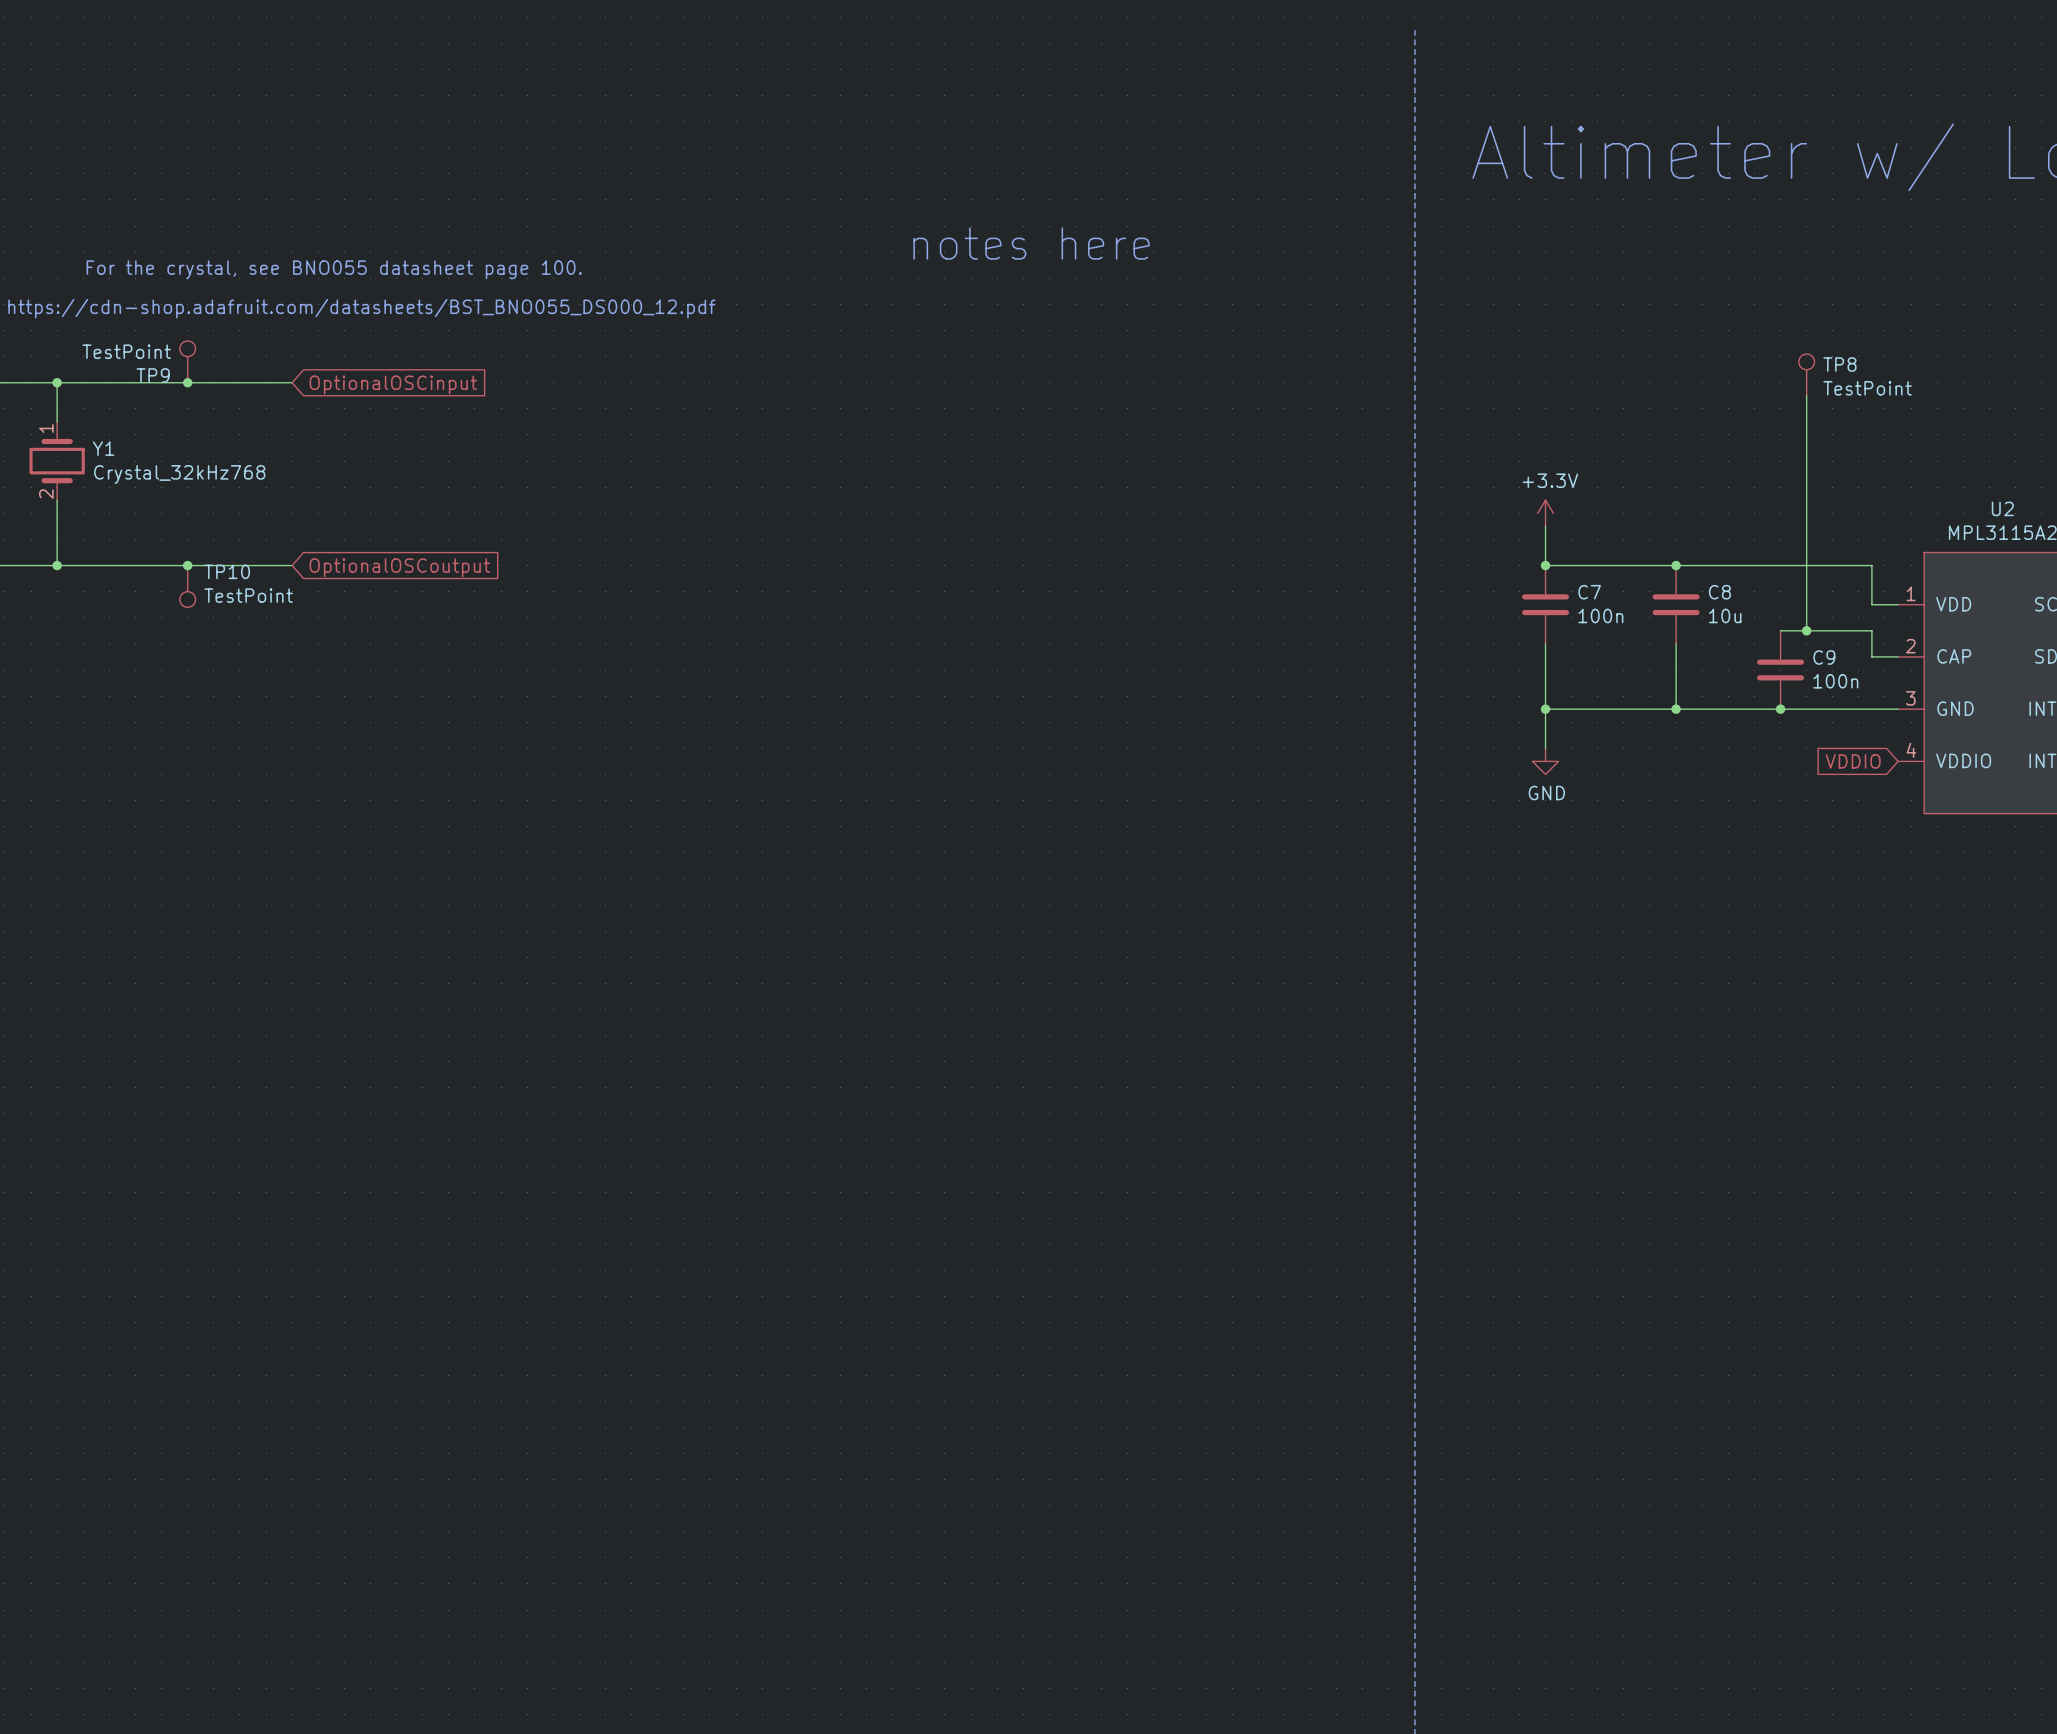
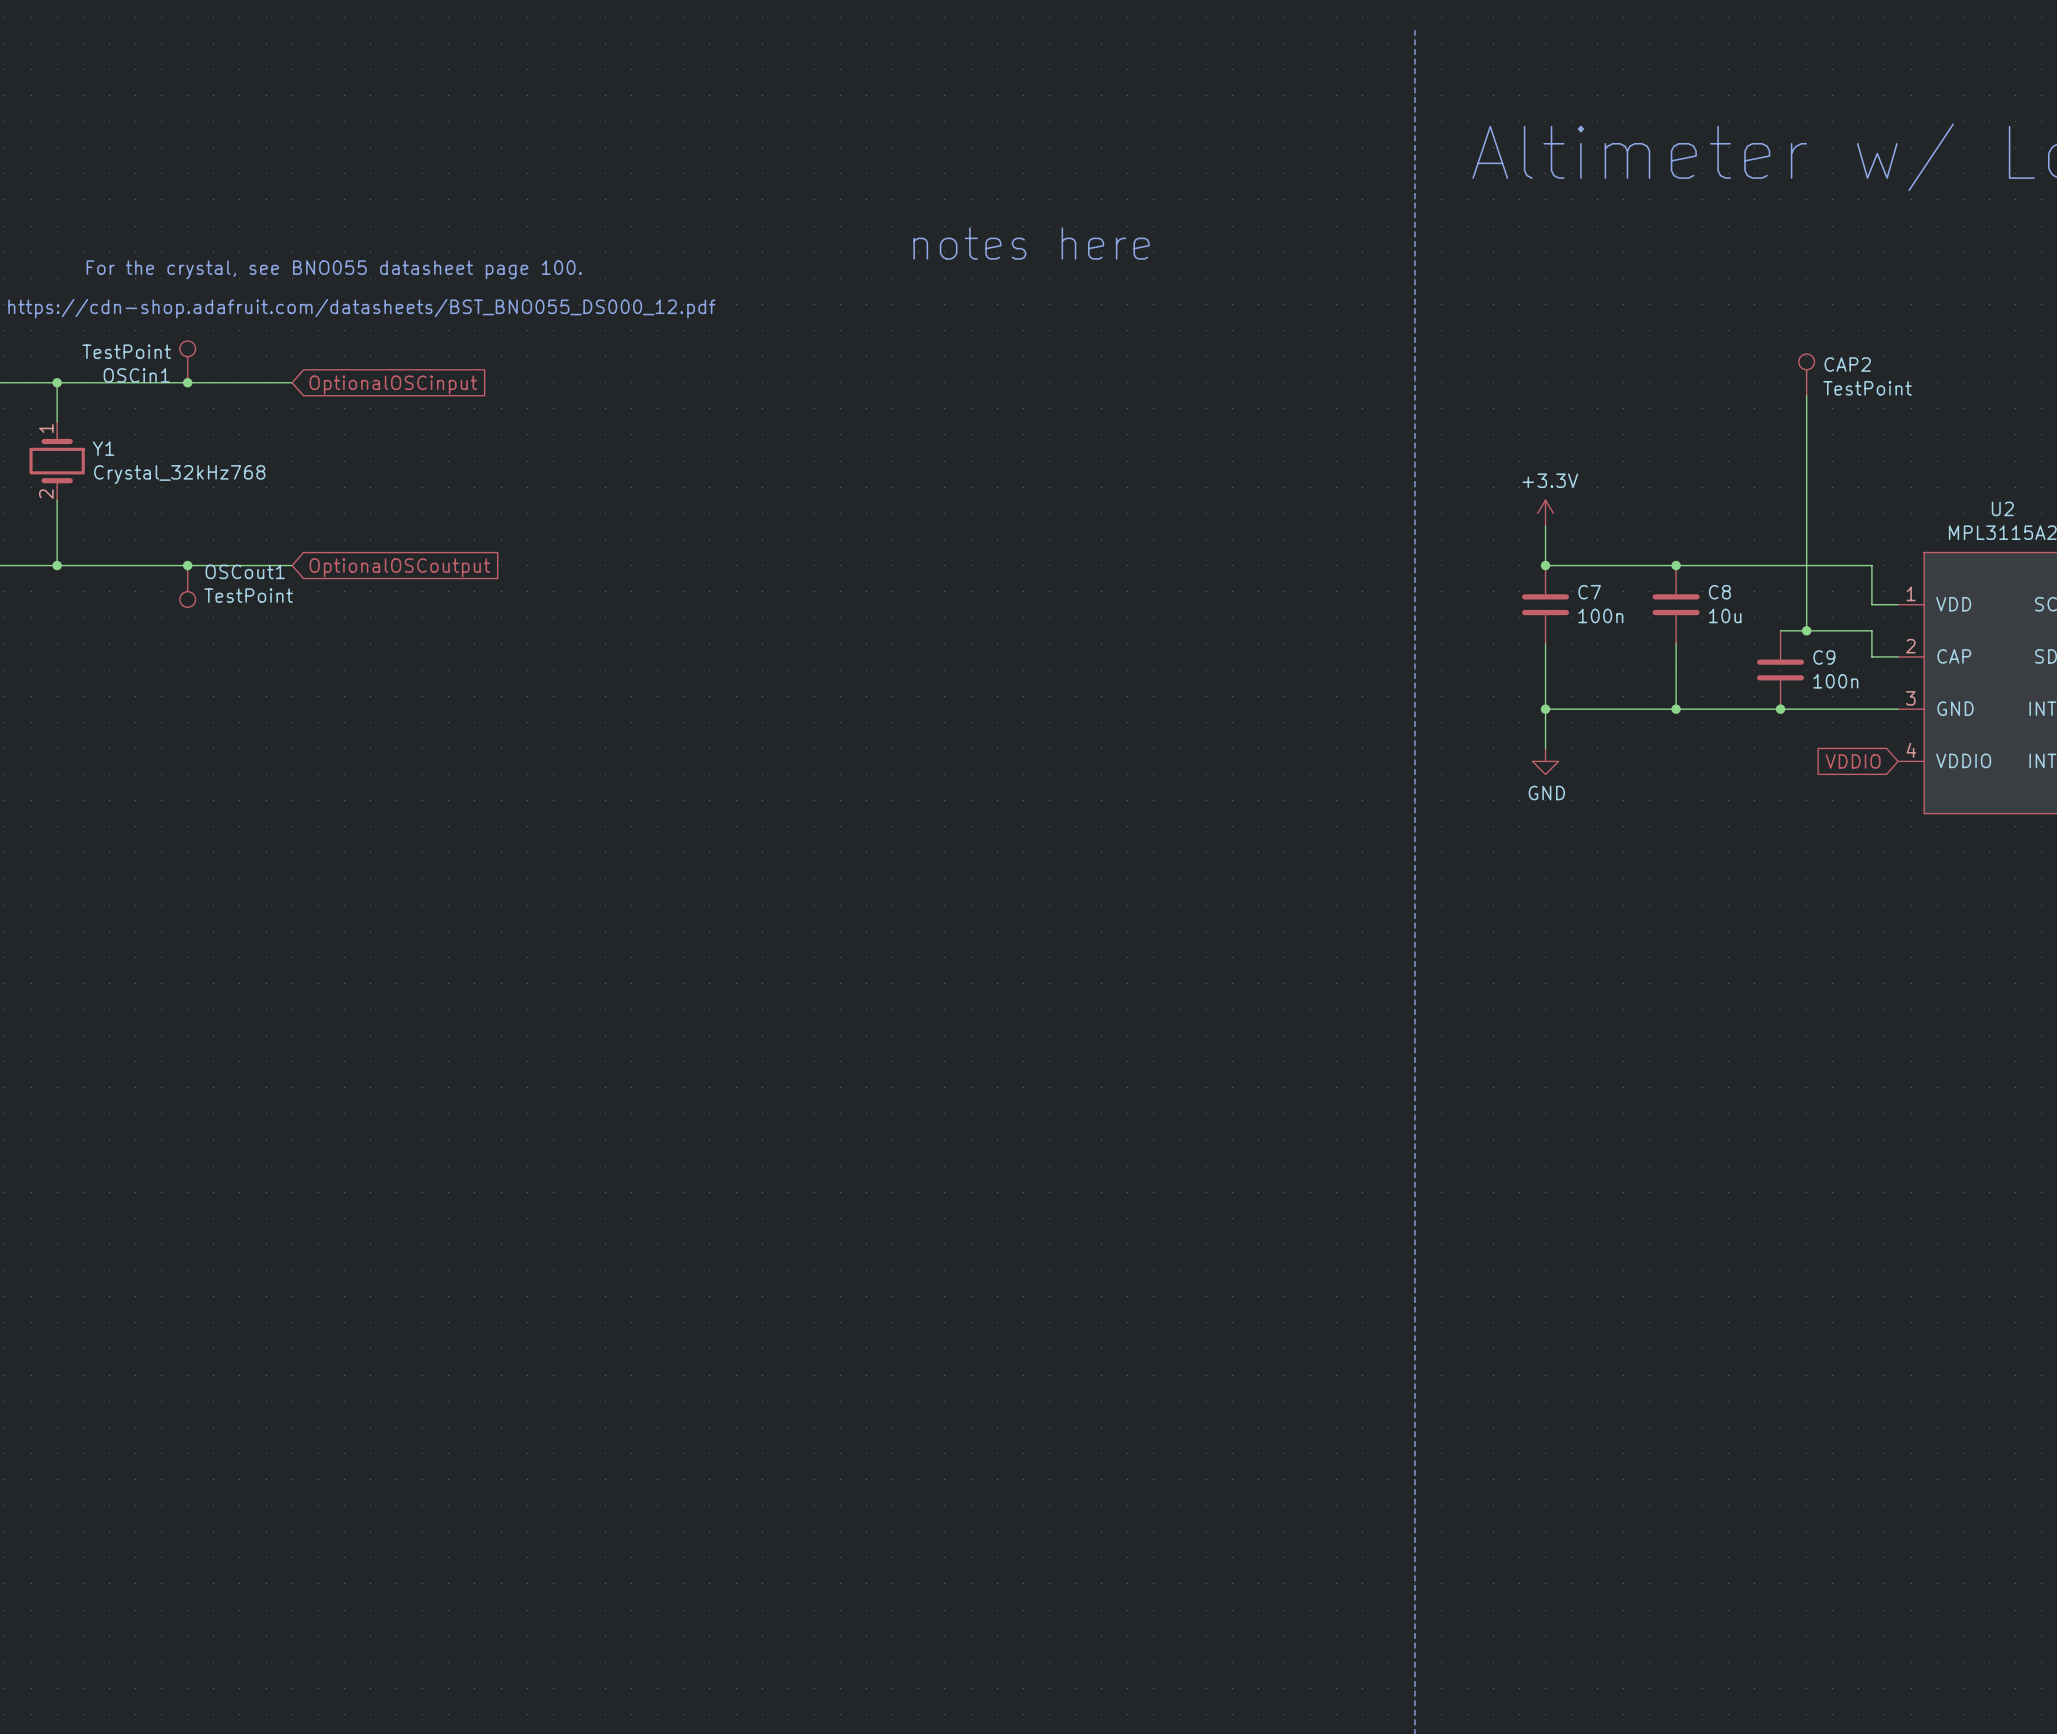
TP8 name: TP8 (1839, 364) -> CAP2 (1847, 364)
TP9 name: TP9 (153, 375) -> OSCin1 (136, 375)
TP10 name: TP10 (227, 571) -> OSCout1 (245, 571)

